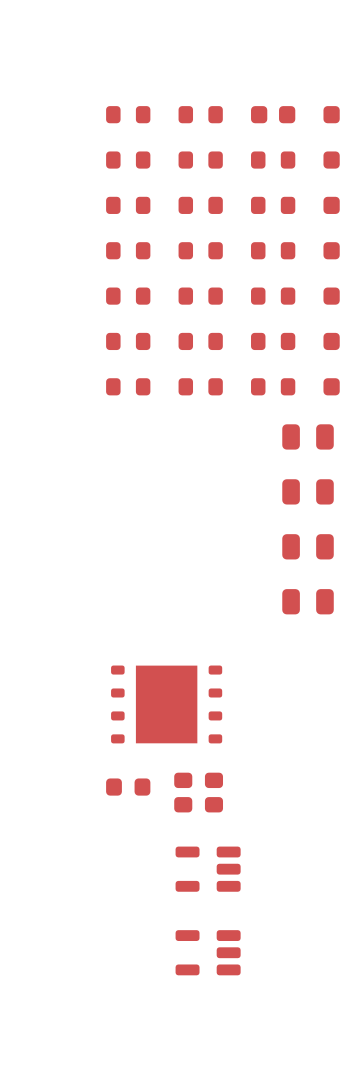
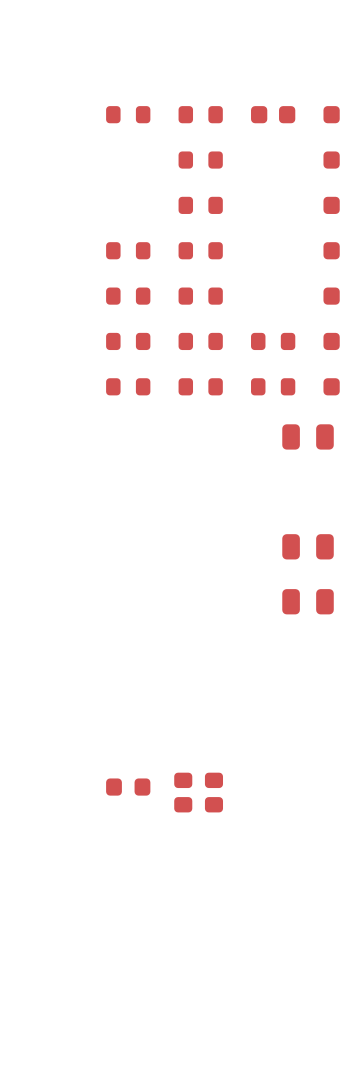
part: (128, 160) -> none
part: (273, 160) -> none
part: (128, 205) -> none
part: (273, 205) -> none
part: (273, 250) -> none
part: (273, 296) -> none
part: (308, 491) -> none
part: (166, 704) -> none
part: (208, 869) -> none
part: (208, 952) -> none

